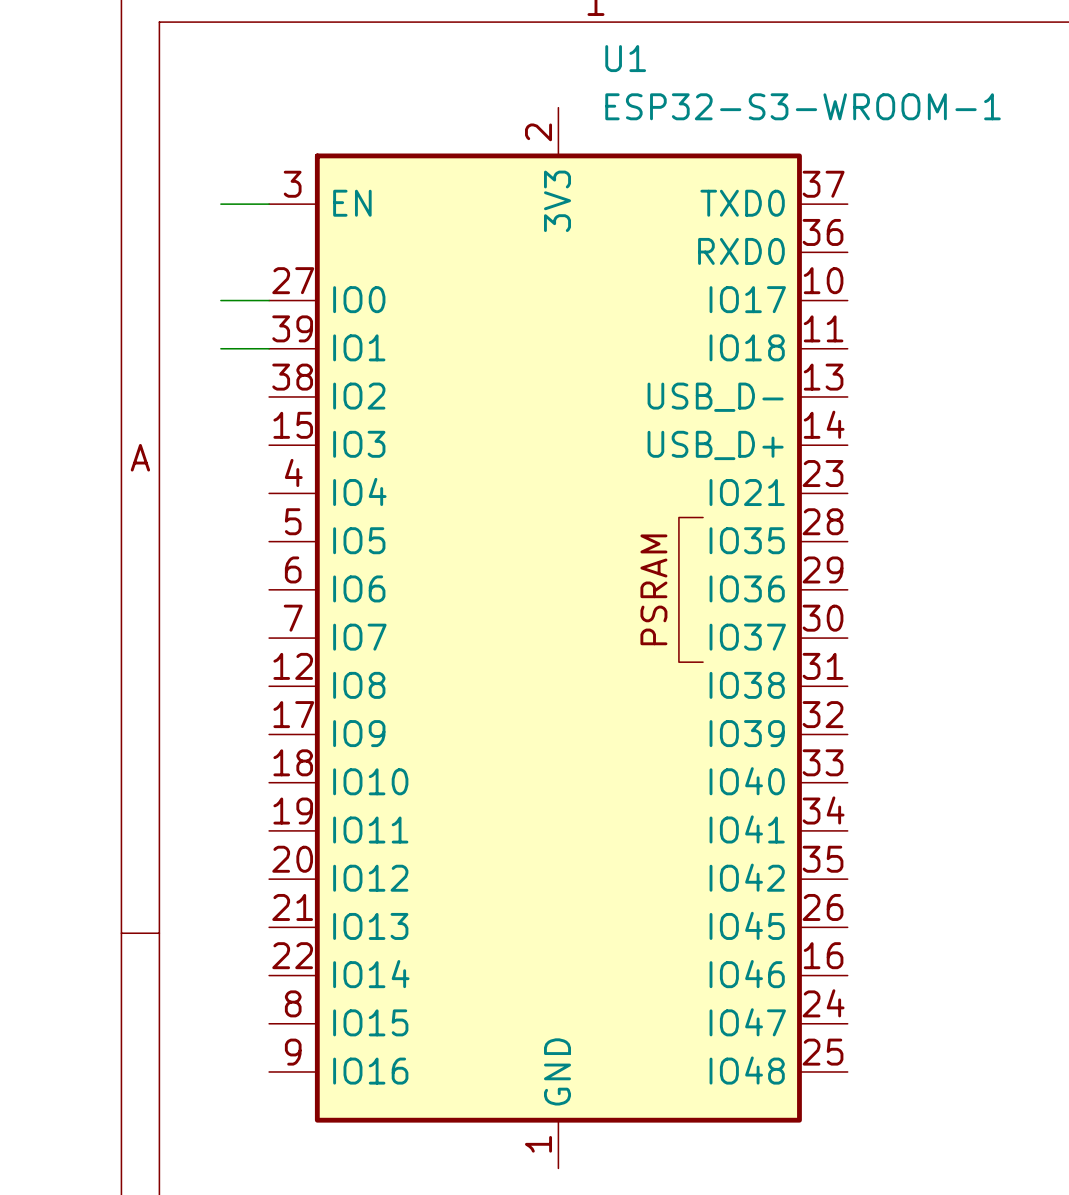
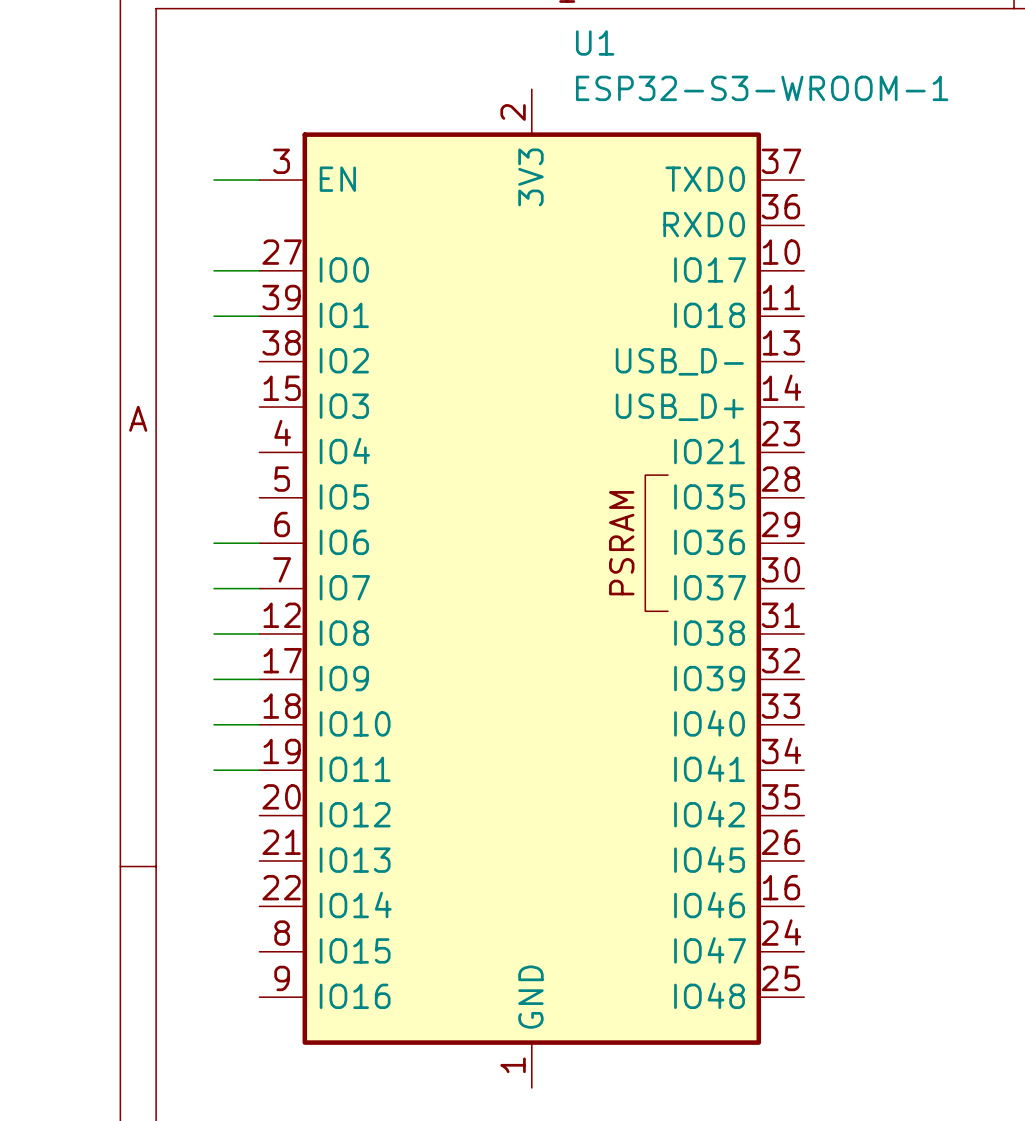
wire: none -> (214, 543) (259, 543)
wire: none -> (214, 588) (259, 588)
wire: none -> (214, 634) (259, 634)
wire: none -> (214, 679) (259, 679)
wire: none -> (214, 724) (259, 724)
wire: none -> (214, 770) (259, 770)

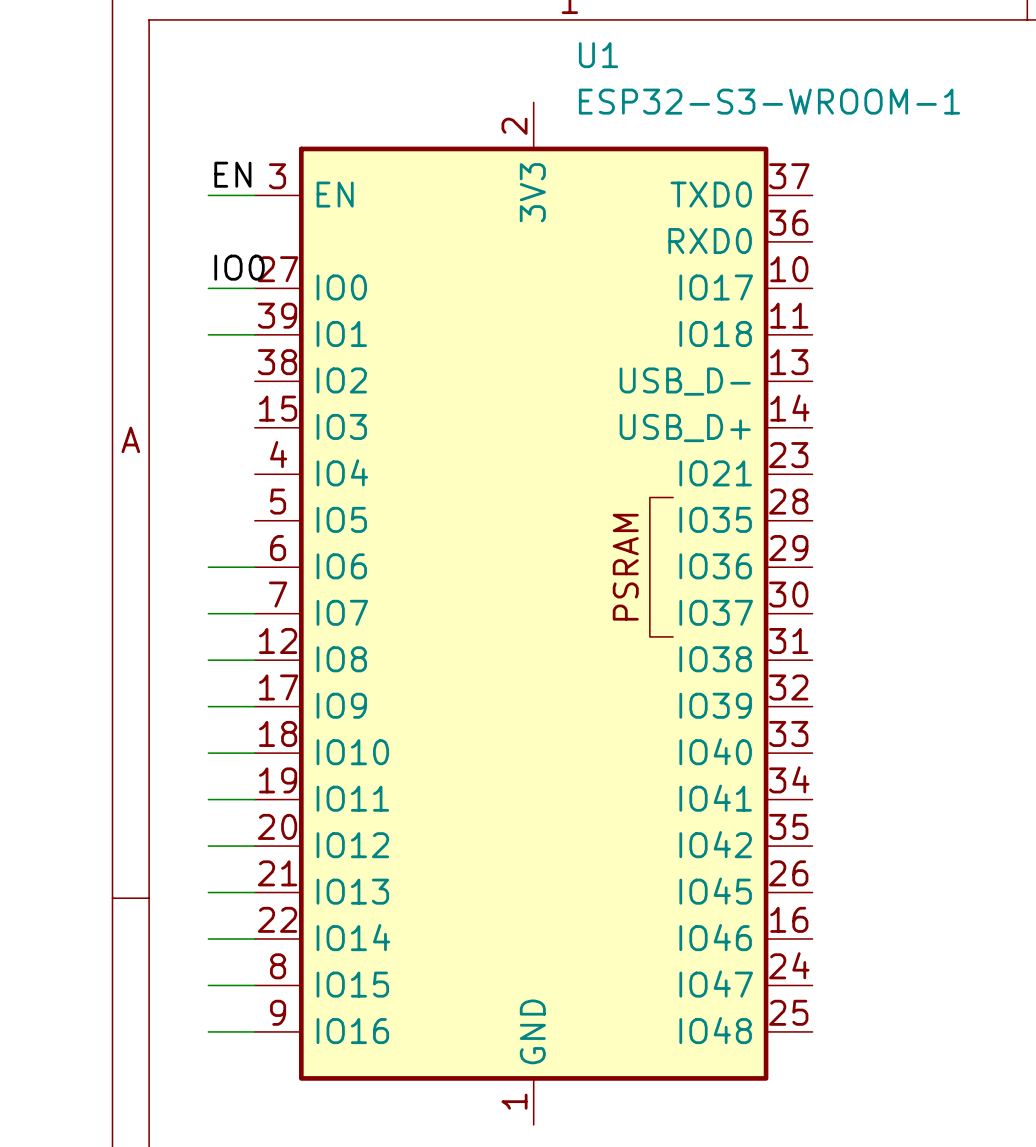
label: none -> EN (232, 174)
label: none -> IO0 (239, 267)
wire: none -> (208, 846) (254, 846)
wire: none -> (208, 892) (254, 892)
wire: none -> (208, 939) (254, 939)
wire: none -> (208, 985) (254, 985)
wire: none -> (208, 1031) (254, 1031)

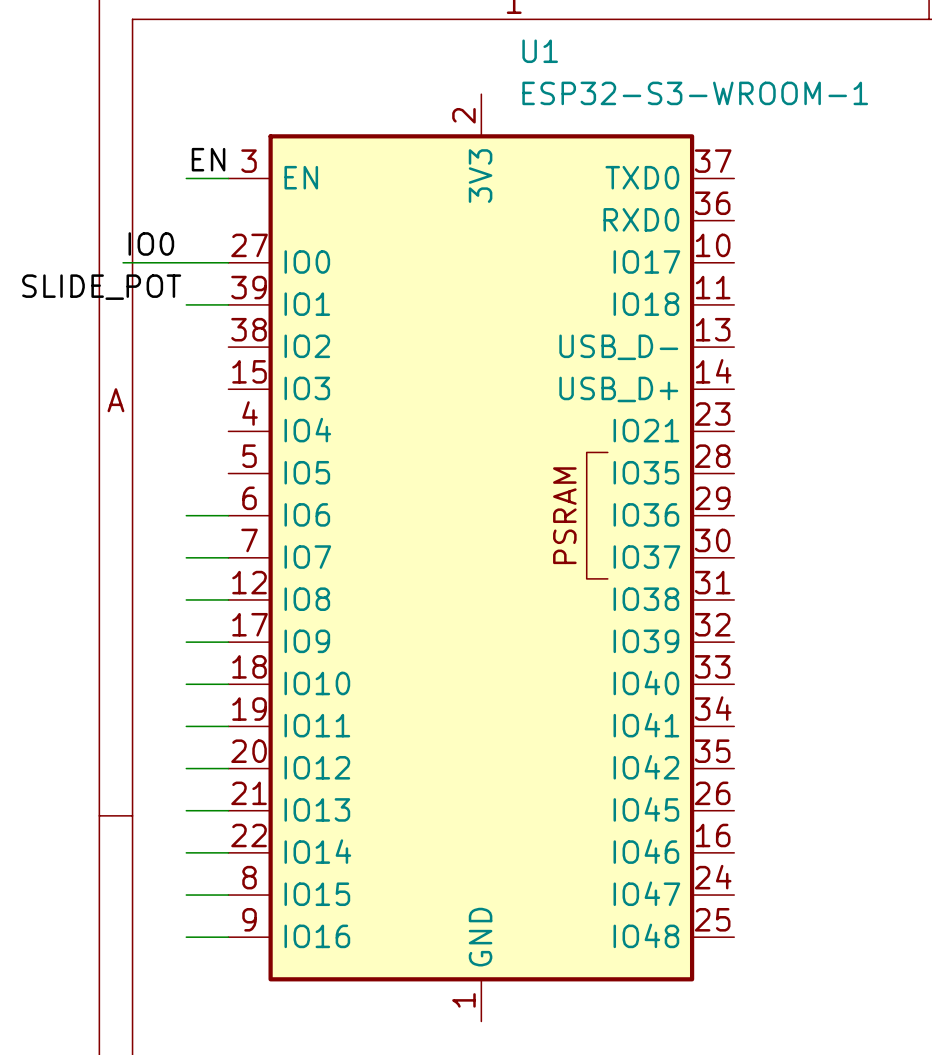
label position: IO0 (239, 267) -> IO0 (151, 243)
wire: none -> (123, 262) (186, 262)
label: none -> SLIDE_POT (101, 287)

